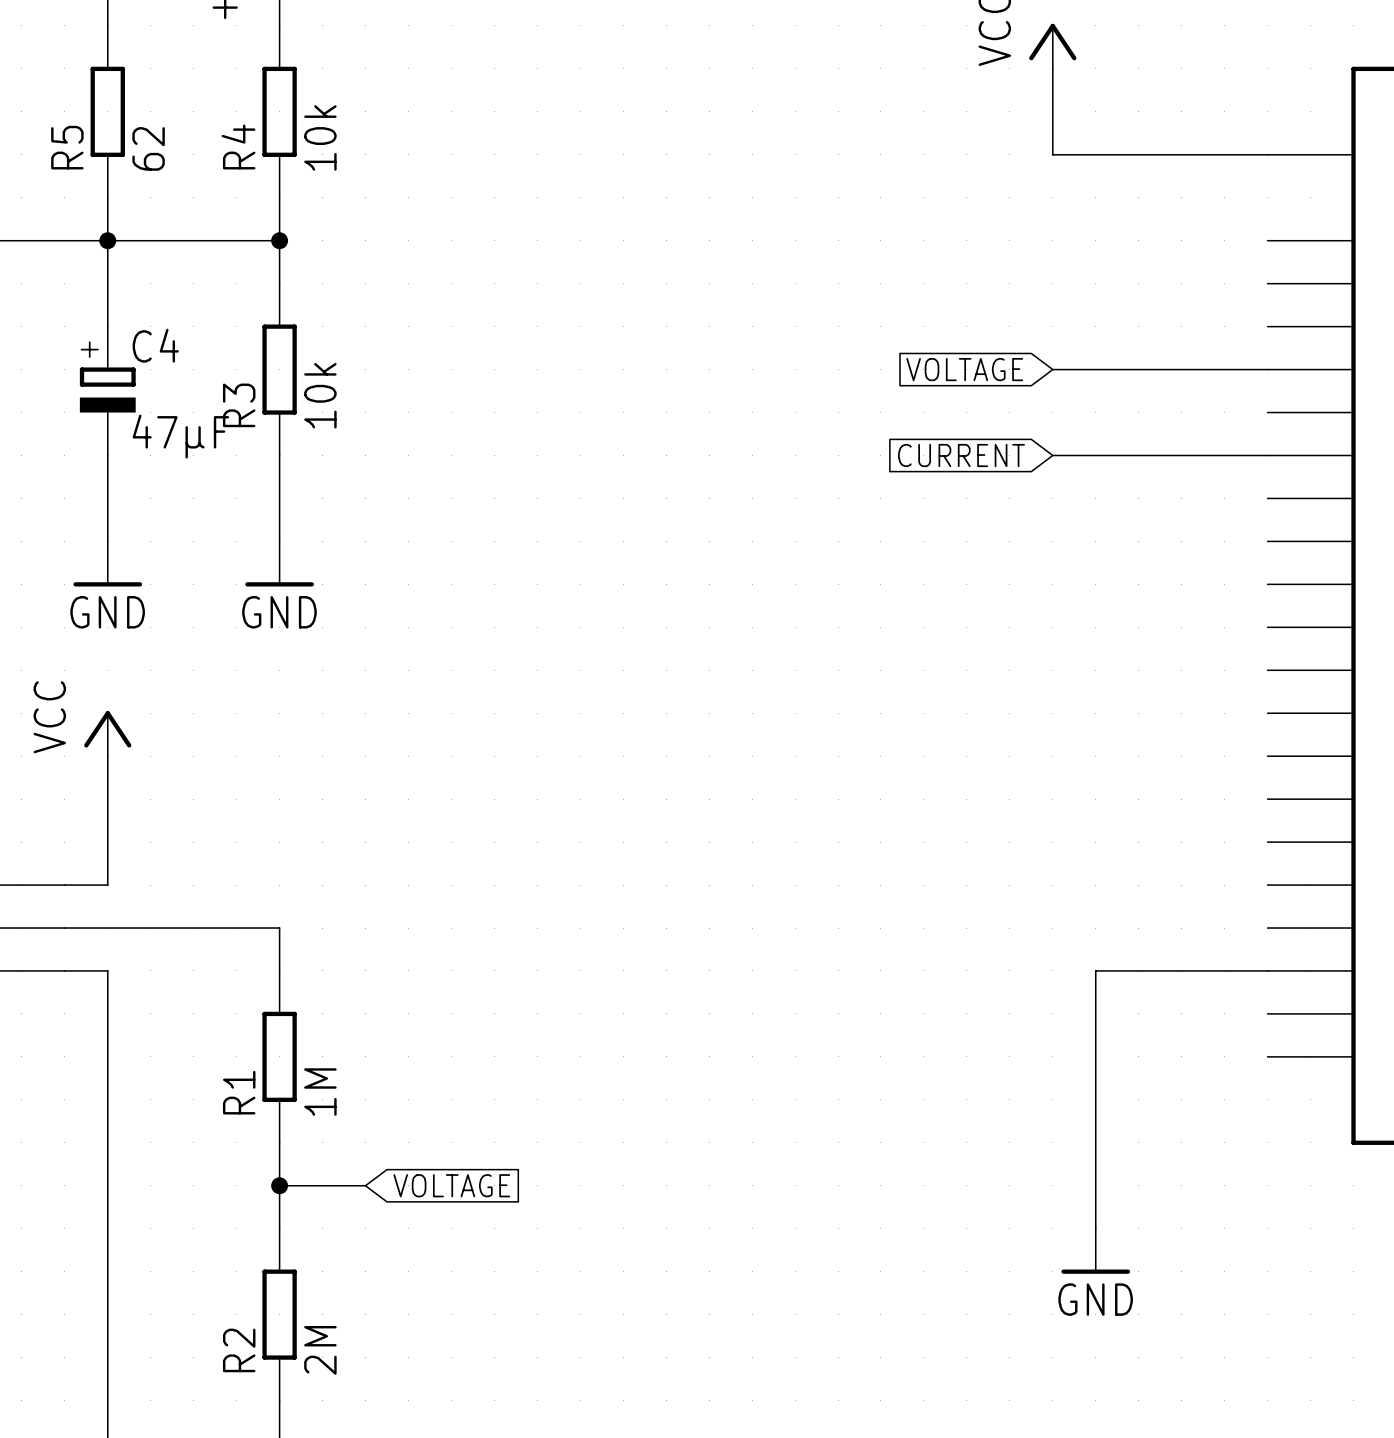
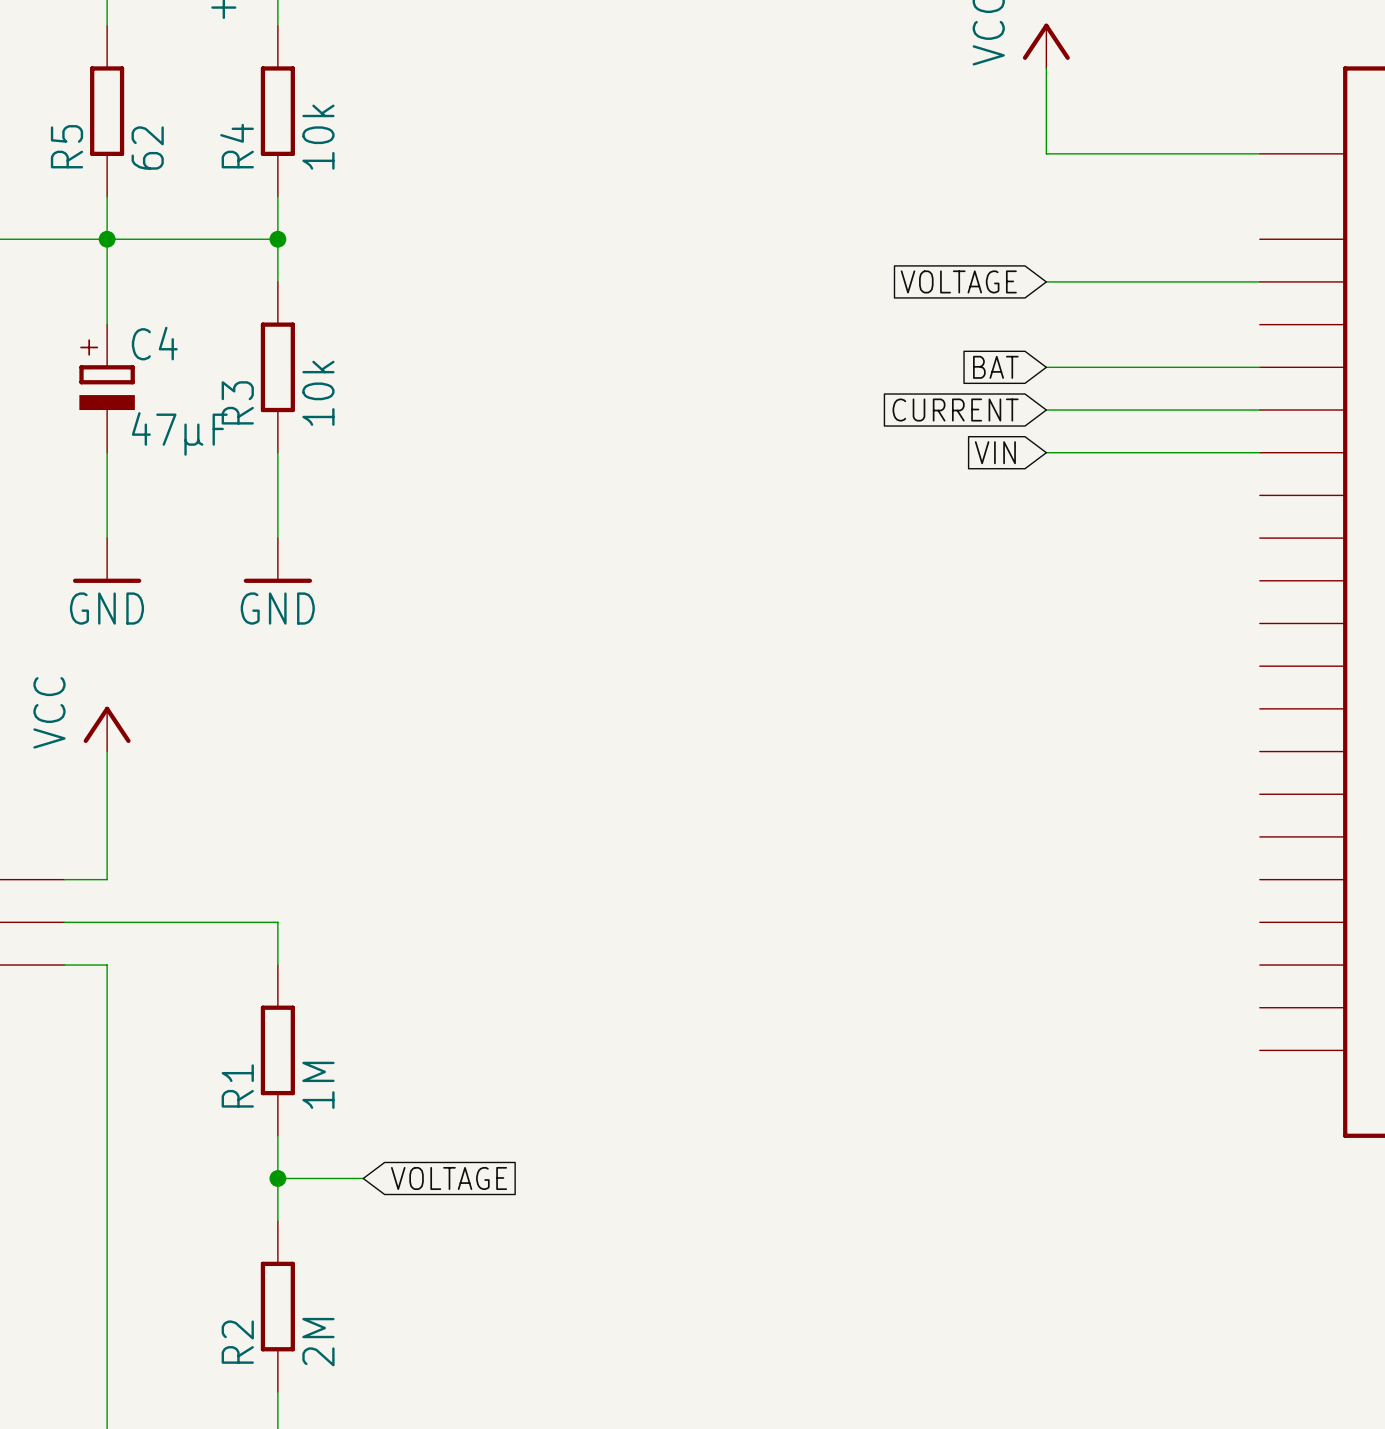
global label: none -> VOLTAGE (958, 281)
wire: none -> (1046, 281) (1259, 281)
global label: VOLTAGE (964, 369) -> BAT (995, 367)
global label: none -> CURRENT (955, 410)
wire: none -> (1046, 410) (1259, 410)
global label: CURRENT (961, 455) -> VIN (995, 452)
wire: (1267, 970) (1095, 970) (1095, 1228) -> none
power symbol: GND (1095, 1251) -> none

